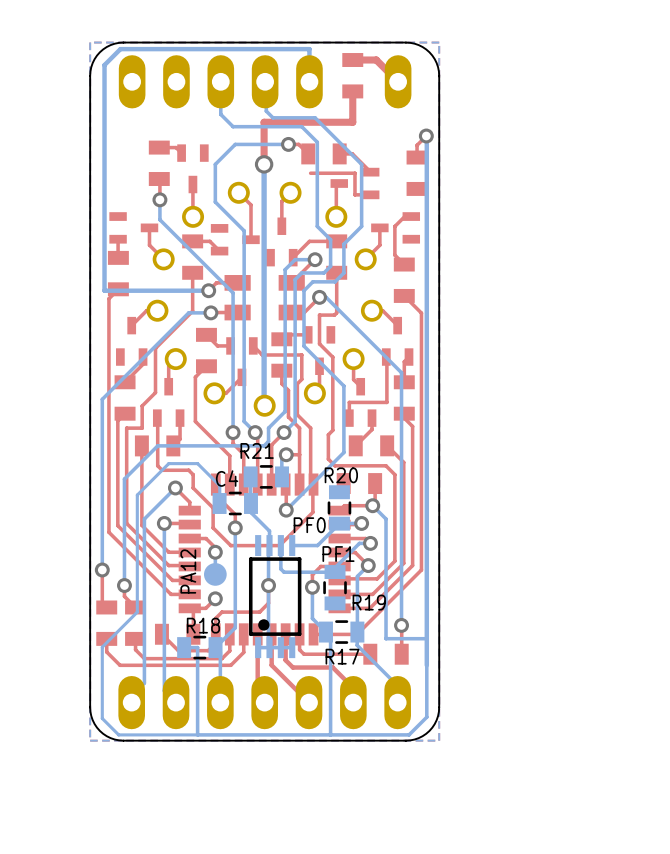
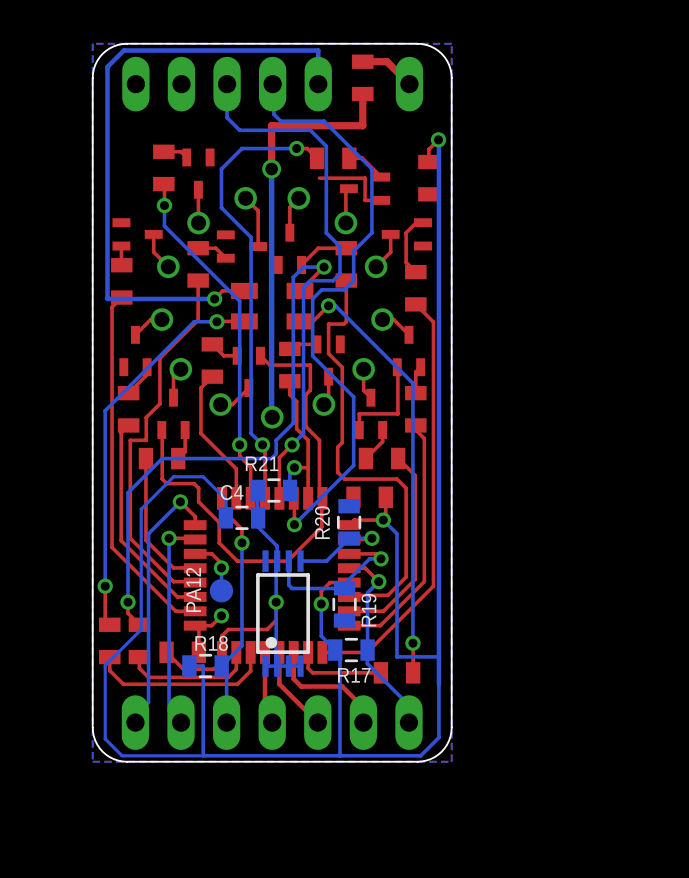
R20 name rotation: 0° (341, 475) -> 90° counterclockwise (322, 522)
text: PF0 (309, 525) -> none
text: PF1 (338, 554) -> none
R19 name rotation: 0° (369, 602) -> 90° counterclockwise (368, 610)

